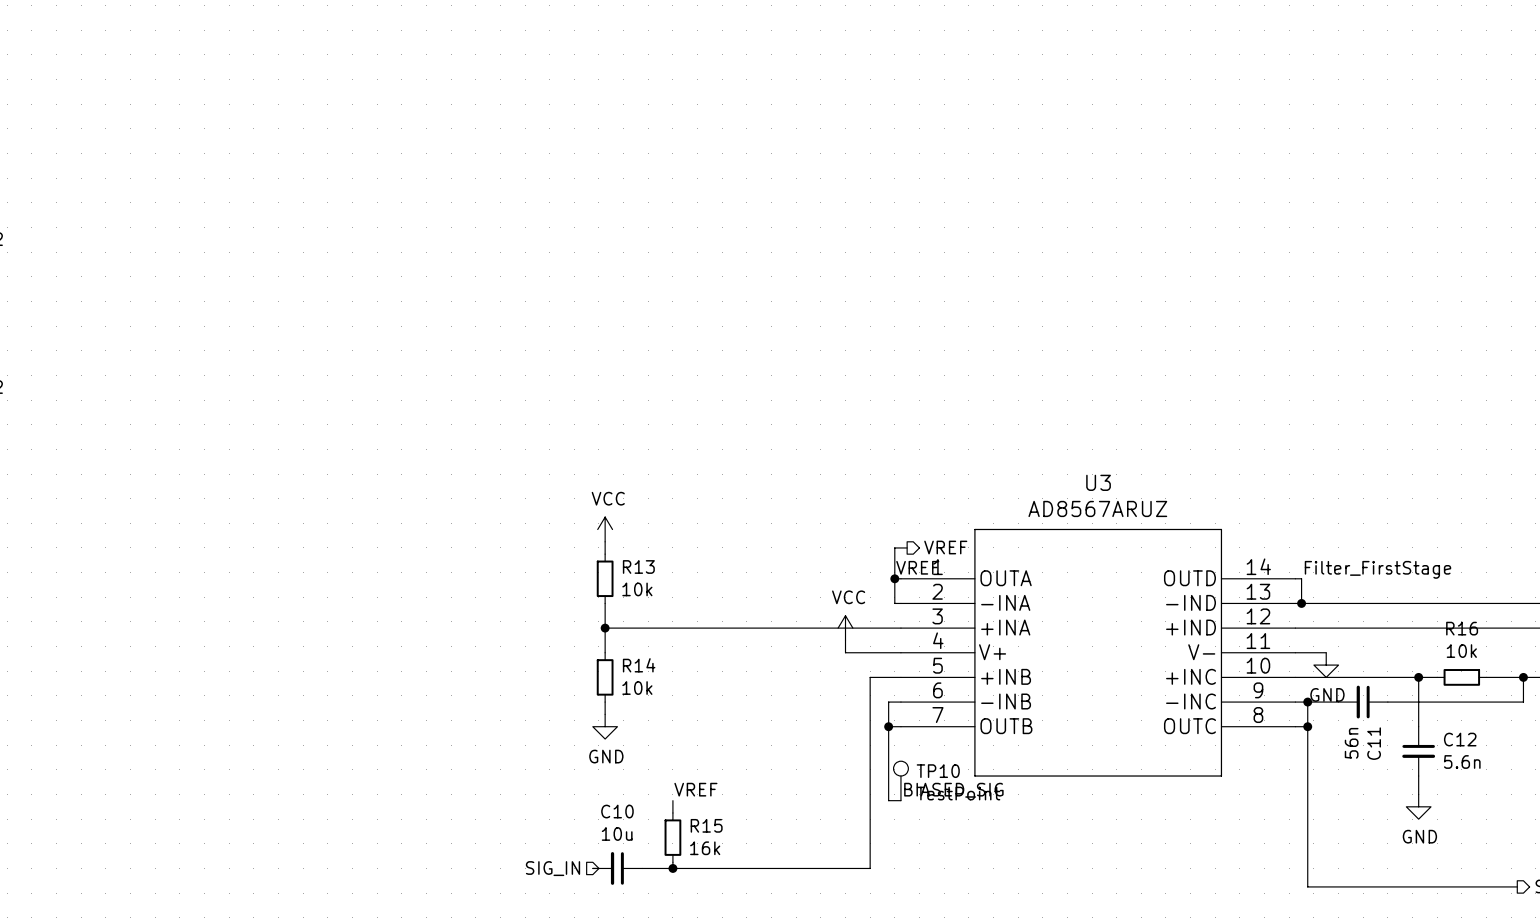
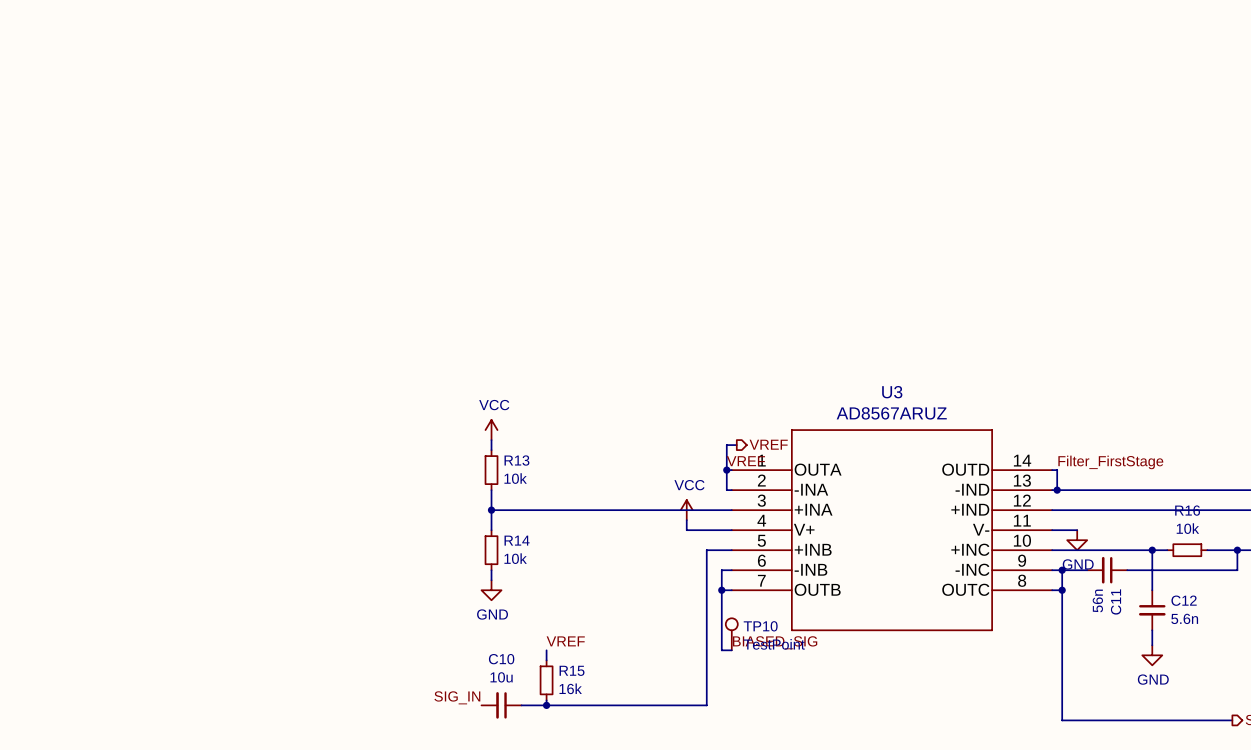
label: none -> SIG_IN (457, 697)
hierarchical label: SIG_IN (553, 868) -> none

